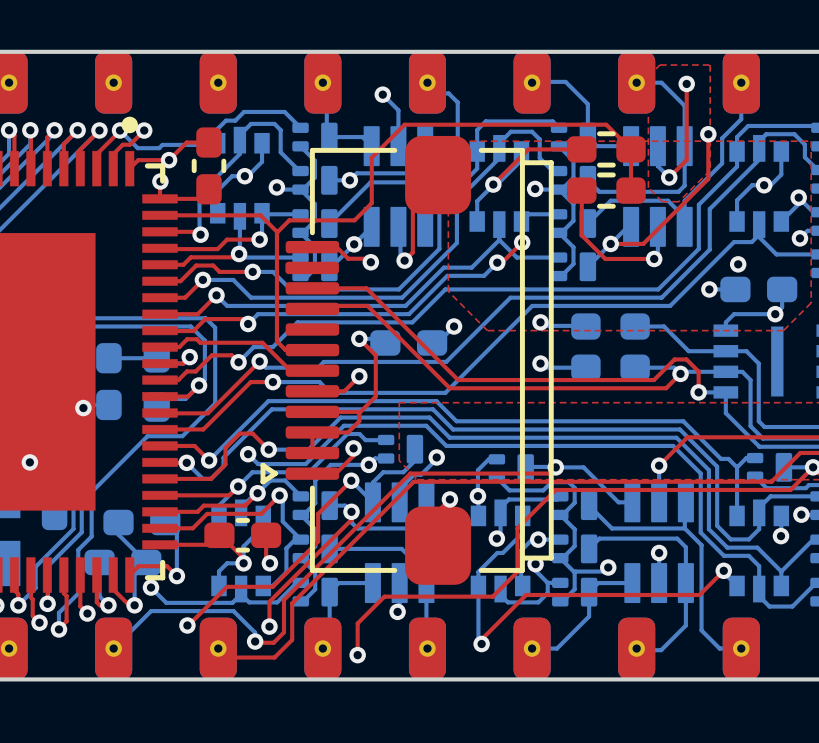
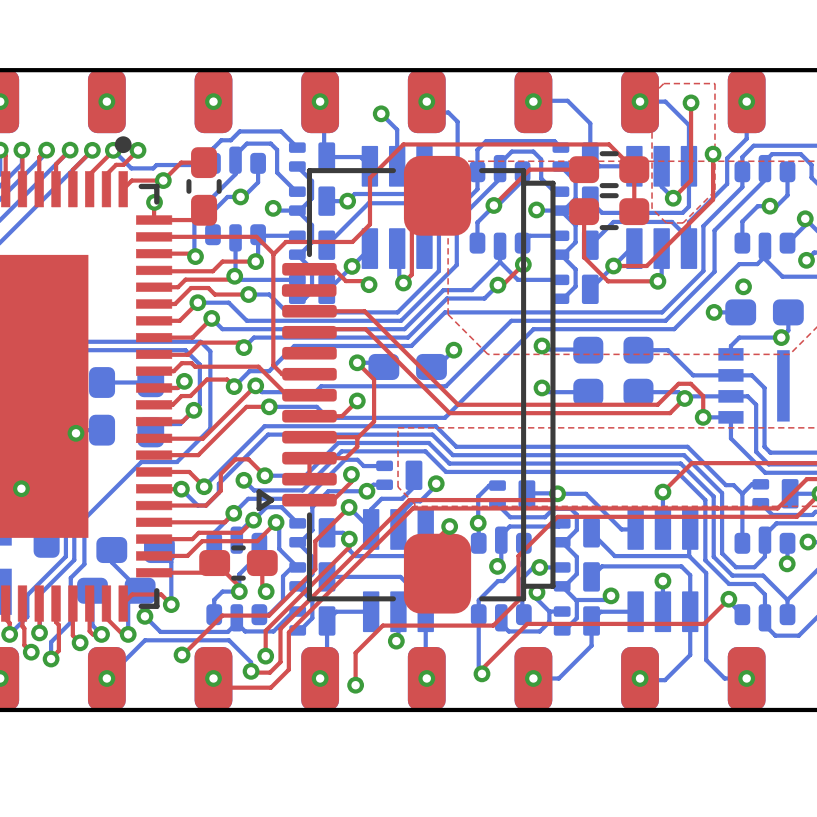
part footprint: [210, 126, 270, 230] -> [205, 146, 266, 252]
part footprint: [469, 135, 530, 238] -> [469, 154, 531, 260]
part footprint: [729, 135, 790, 238] -> [734, 154, 796, 260]
part footprint: [211, 499, 271, 603] -> [206, 526, 268, 632]
part footprint: [470, 499, 531, 603] -> [470, 526, 532, 632]
part footprint: [729, 499, 790, 603] -> [734, 526, 796, 632]

